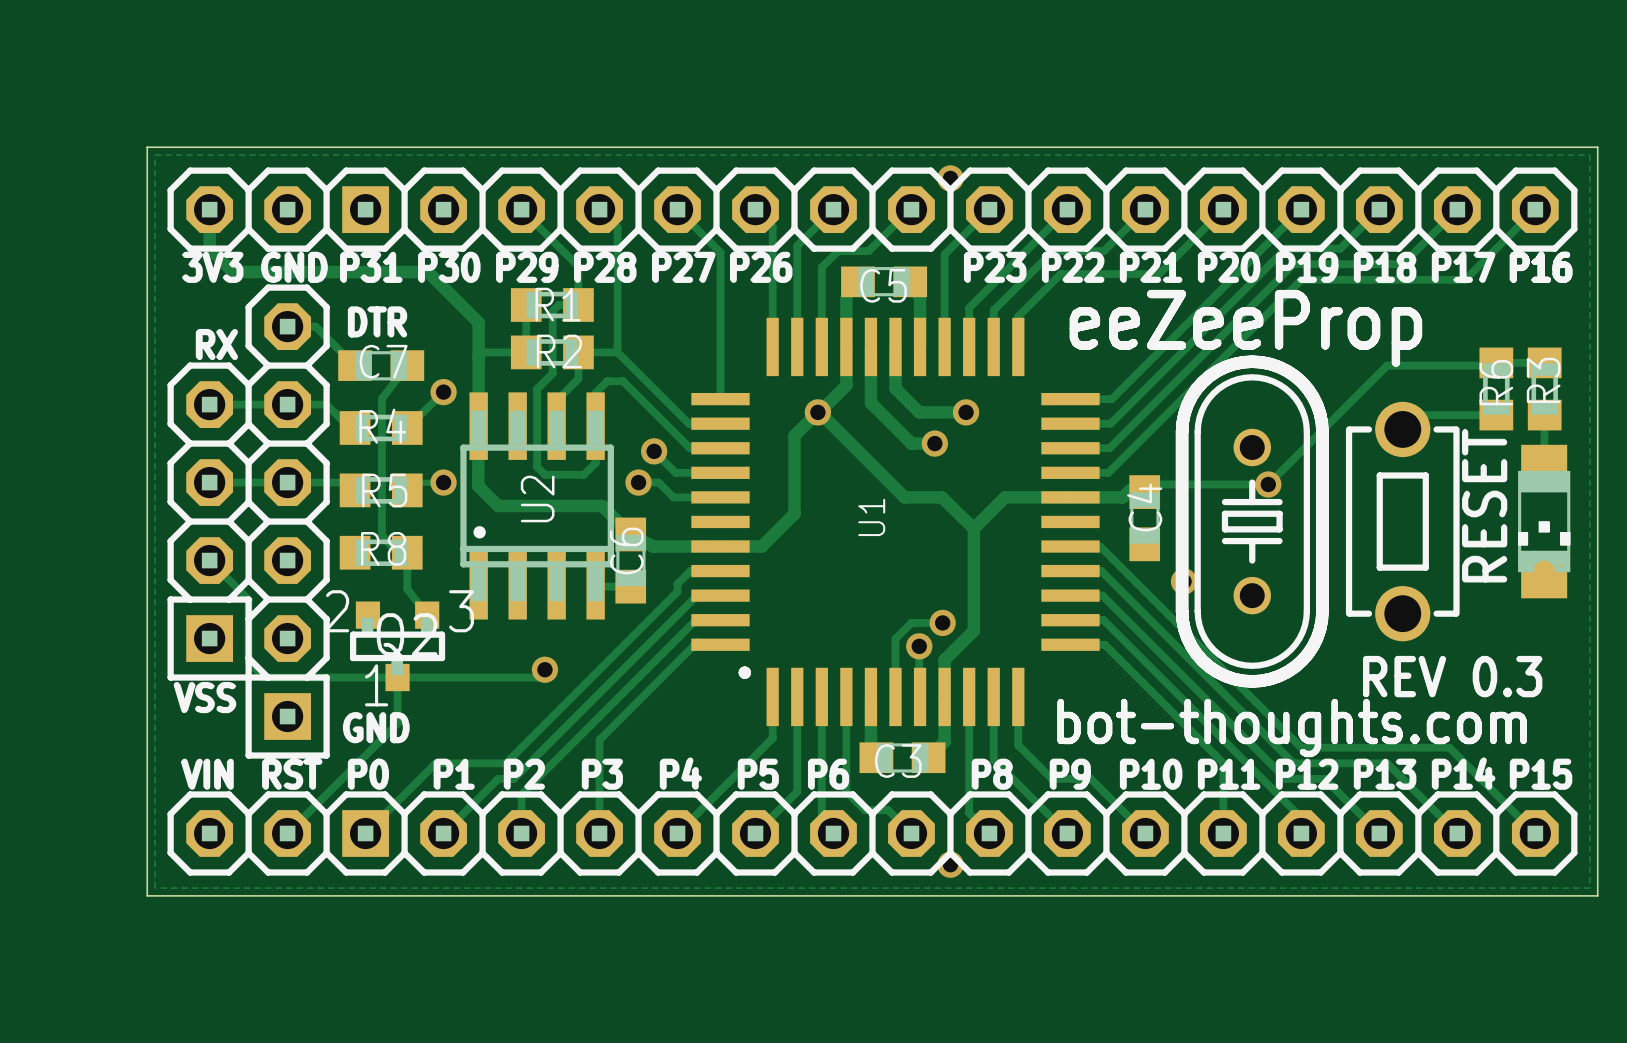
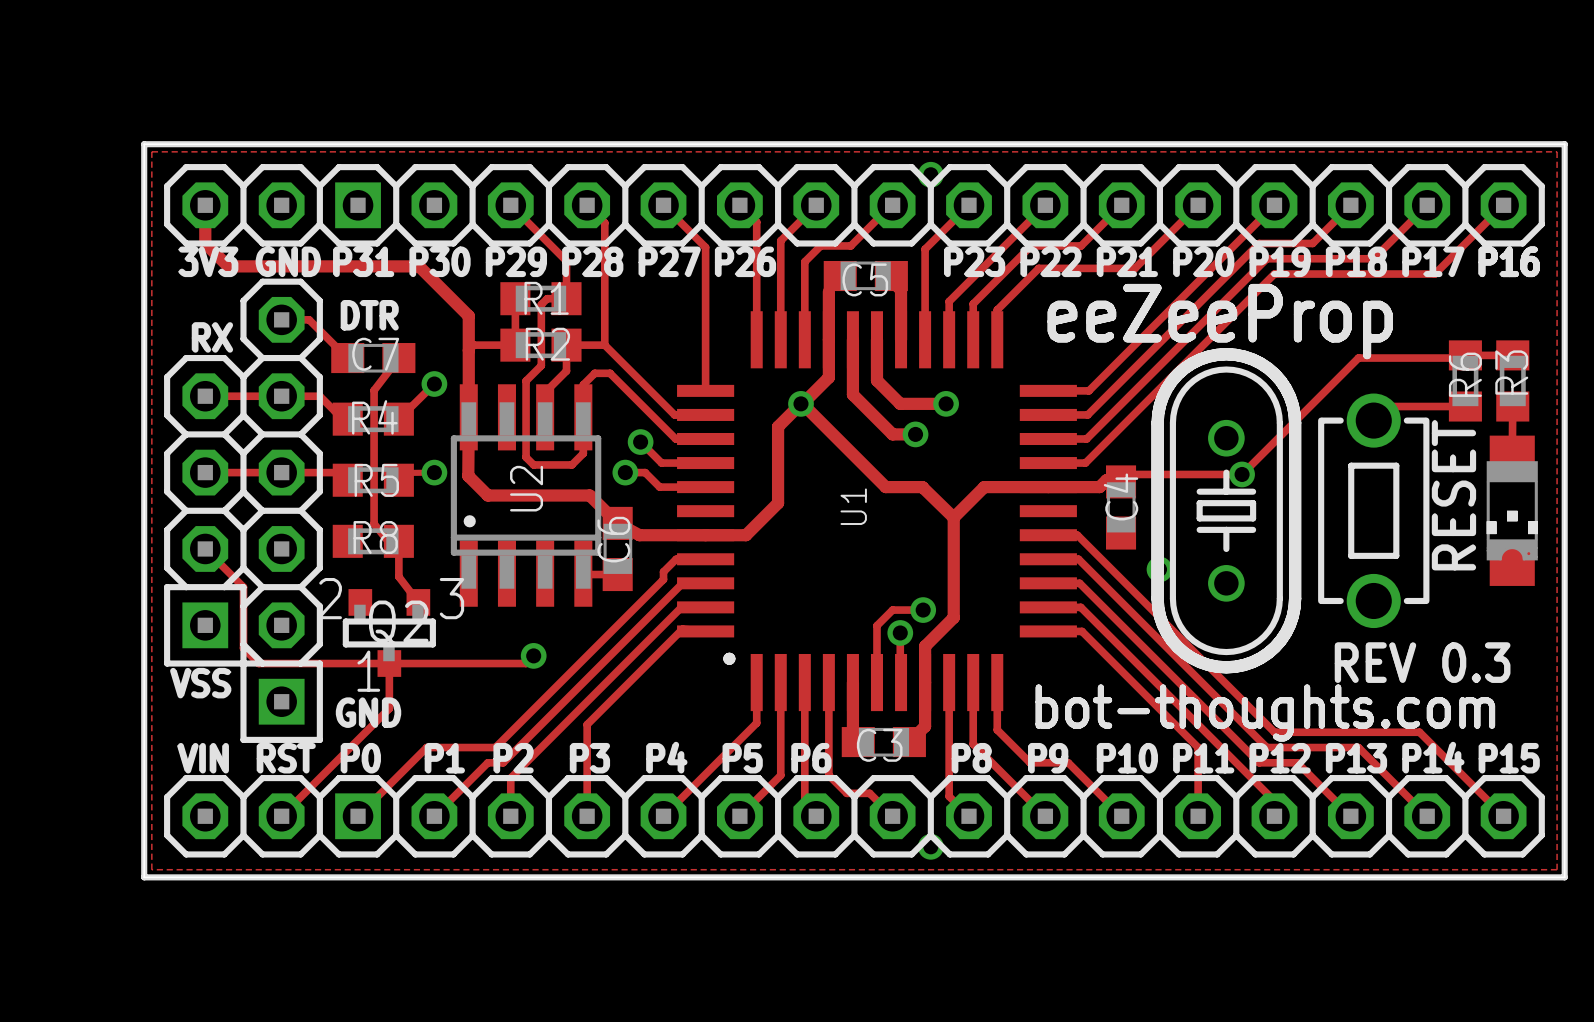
line: none -> (144, 144) (1564, 144) (1564, 877) (144, 877) (144, 144)

